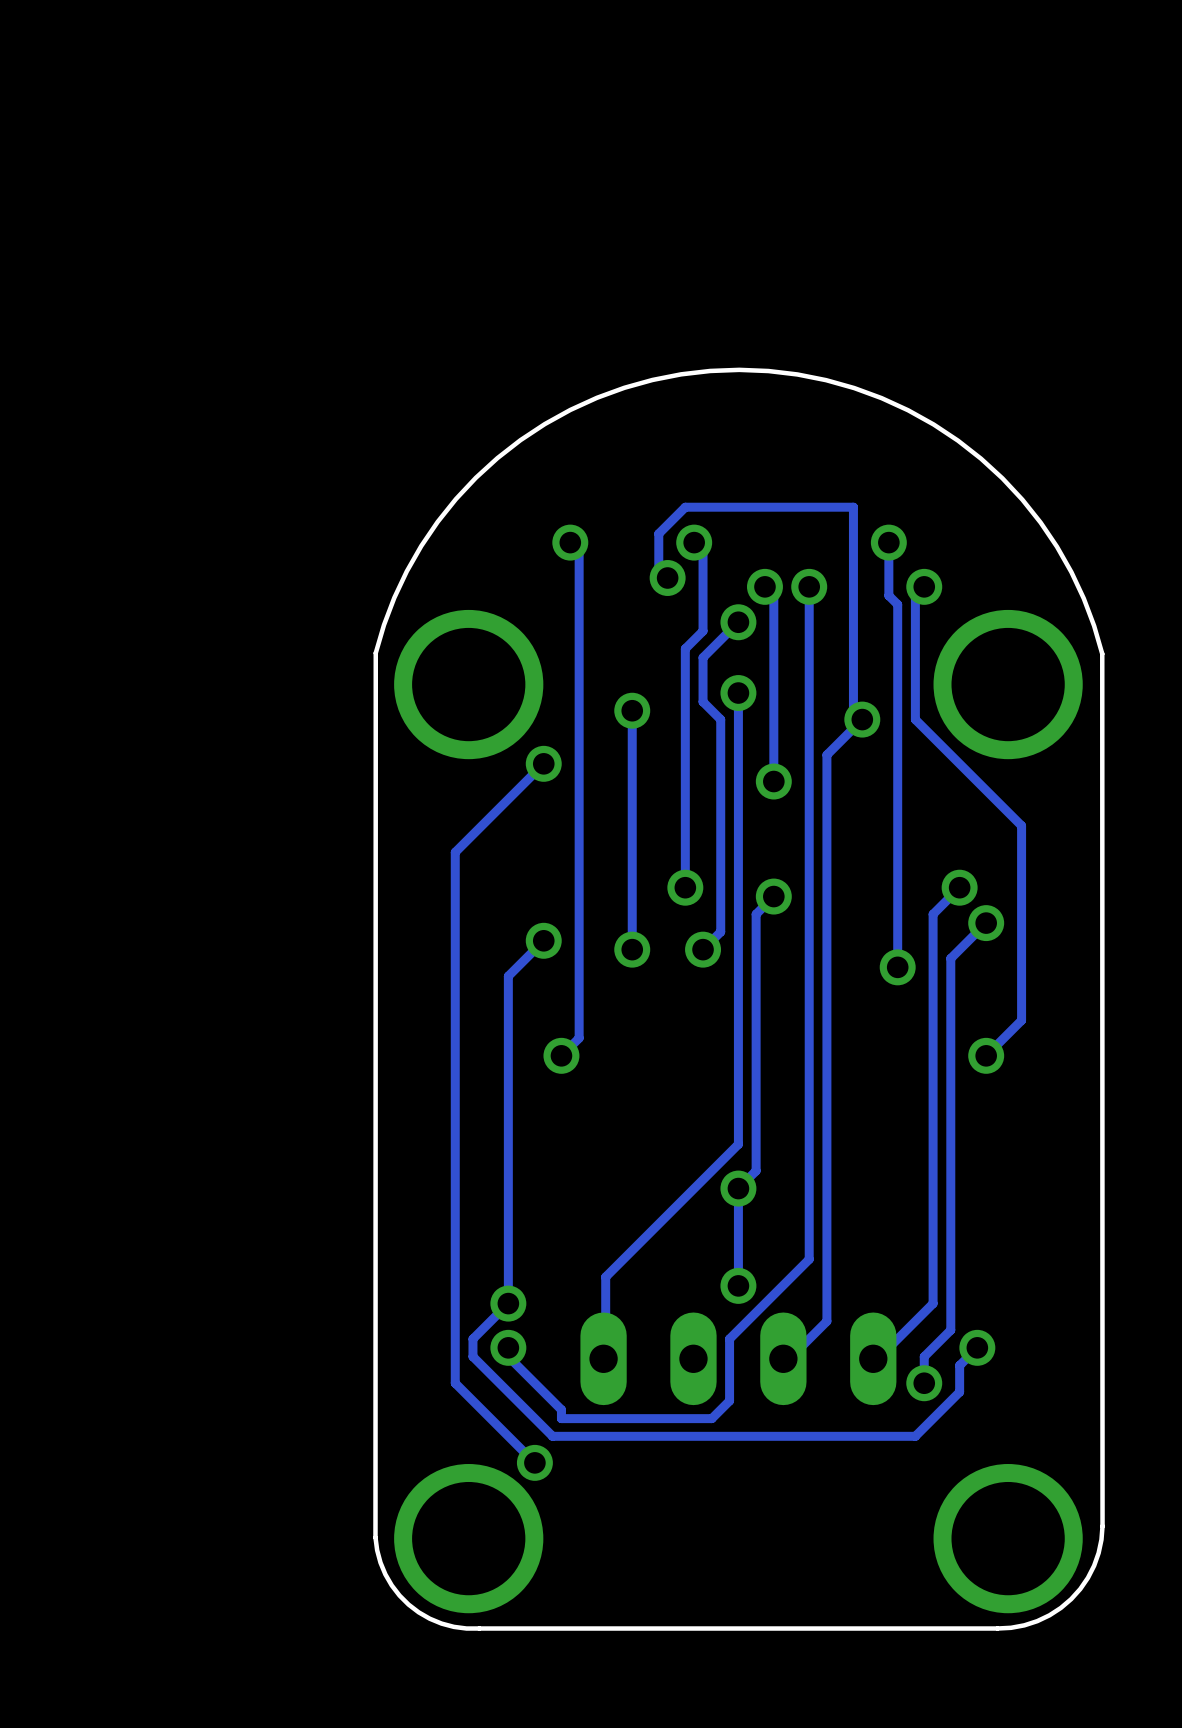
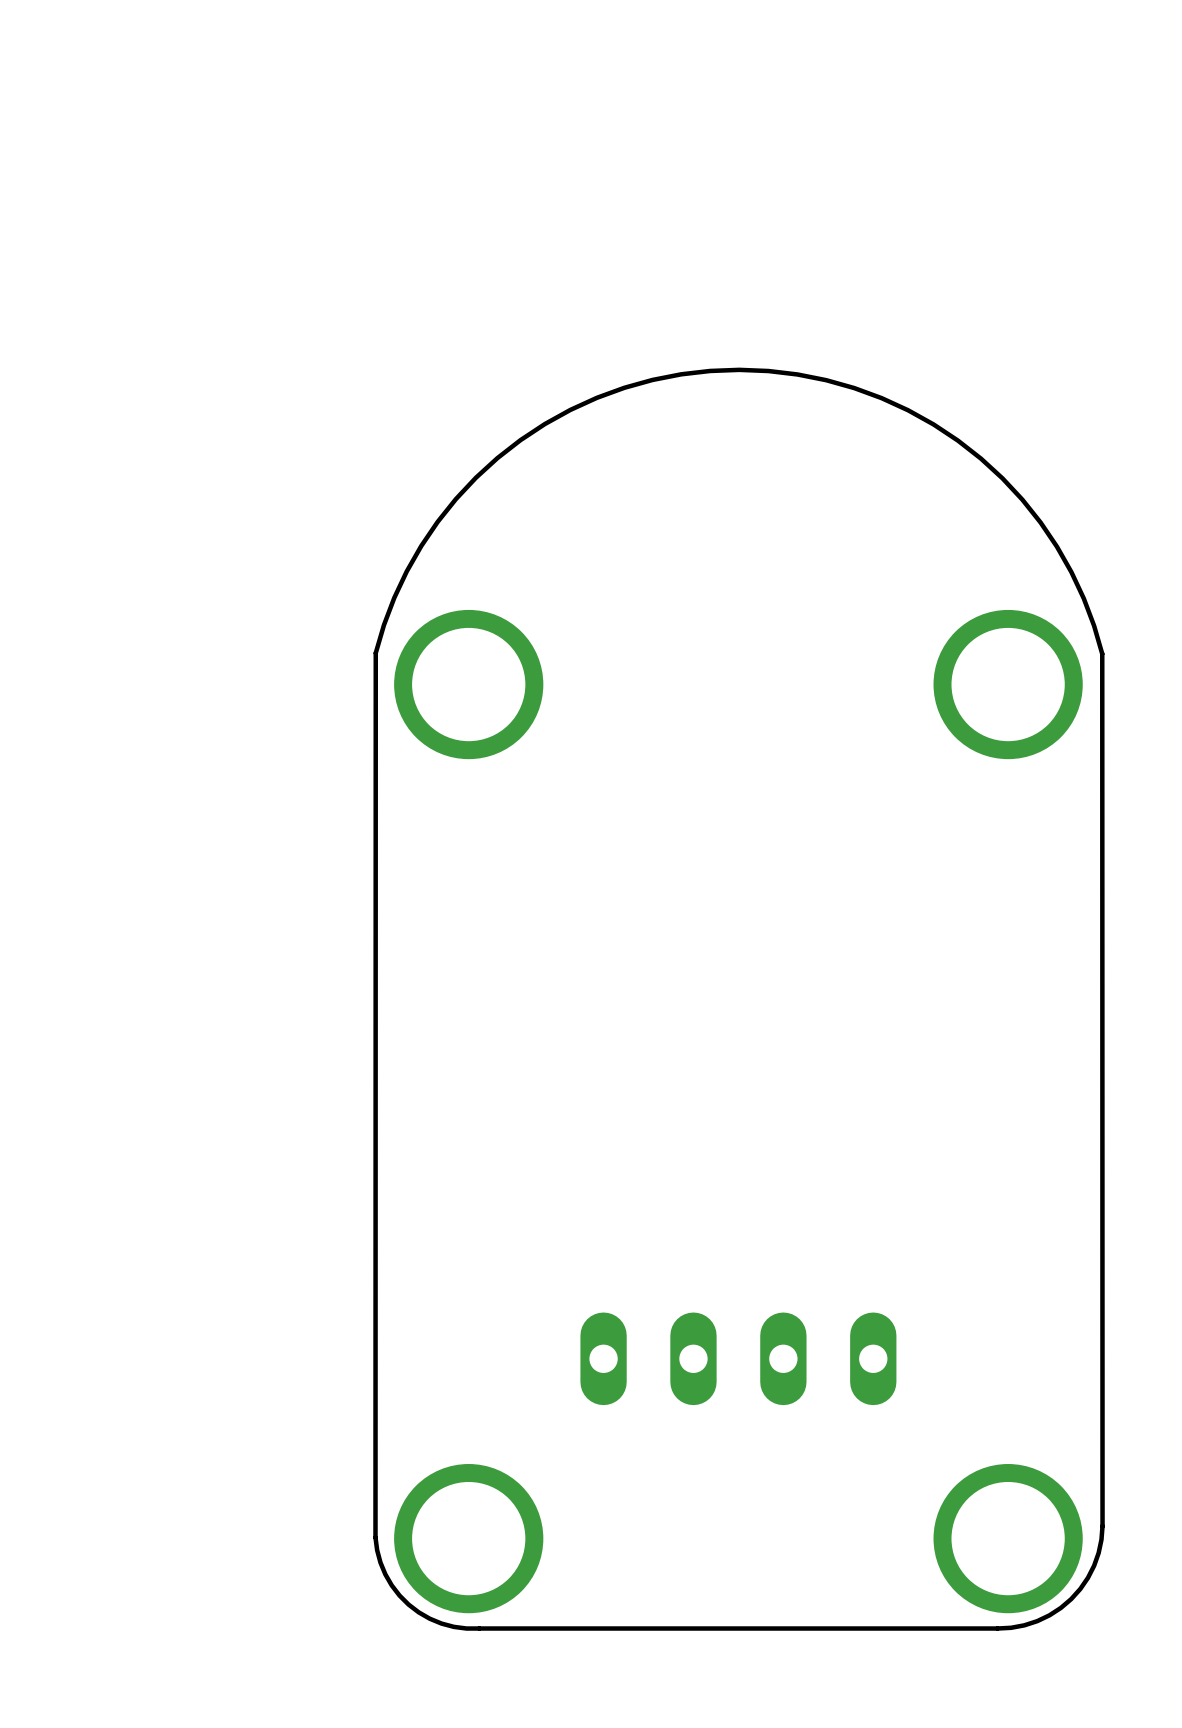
track: (570, 542) (579, 551) (579, 1038) (561, 1055) -> none
via: (570, 542) -> none
track: (694, 542) (703, 551) (703, 631) (685, 648) (685, 887) -> none
via: (694, 542) -> none
track: (888, 542) (888, 595) (897, 604) (897, 967) -> none
via: (888, 542) -> none
track: (667, 578) (658, 569) (658, 533) (685, 507) (853, 507) (853, 728) -> none
via: (667, 578) -> none
track: (764, 586) (773, 595) (773, 781) -> none
via: (764, 586) -> none
track: (809, 586) (809, 1259) (729, 1338) (729, 1400) (711, 1418) (561, 1418) (561, 1409) (508, 1356) (508, 1347) -> none
via: (809, 586) -> none
track: (924, 586) (915, 595) (915, 719) (1021, 825) (1021, 1020) (986, 1055) -> none
via: (924, 586) -> none
track: (738, 622) (703, 657) (703, 701) (720, 719) (720, 931) (703, 949) -> none
via: (738, 622) -> none
track: (738, 693) (738, 1144) (605, 1277) (605, 1356) (603, 1358) -> none
via: (738, 693) -> none
track: (632, 710) (632, 949) -> none
via: (632, 710) -> none
track: (862, 719) (826, 754) (826, 1321) (791, 1356) (783, 1358) -> none
via: (862, 719) -> none
track: (543, 763) (455, 852) (455, 1383) (534, 1462) -> none
via: (543, 763) -> none
via: (773, 781) -> none
via: (685, 887) -> none
track: (959, 887) (933, 914) (933, 1303) (880, 1356) (873, 1358) -> none
via: (959, 887) -> none
track: (773, 896) (756, 914) (756, 1170) (738, 1188) (738, 1285) -> none
via: (773, 896) -> none
track: (986, 923) (950, 958) (950, 1330) (924, 1356) (924, 1383) -> none
via: (986, 923) -> none
track: (543, 940) (508, 976) (508, 1303) (472, 1338) (472, 1356) (552, 1436) (915, 1436) (959, 1392) (959, 1365) (977, 1347) -> none
via: (543, 940) -> none
via: (632, 949) -> none
via: (703, 949) -> none
via: (897, 967) -> none
via: (561, 1055) -> none
via: (986, 1055) -> none
via: (738, 1188) -> none
via: (738, 1285) -> none
via: (508, 1303) -> none
via: (508, 1347) -> none
via: (977, 1347) -> none
via: (924, 1383) -> none
via: (534, 1462) -> none

